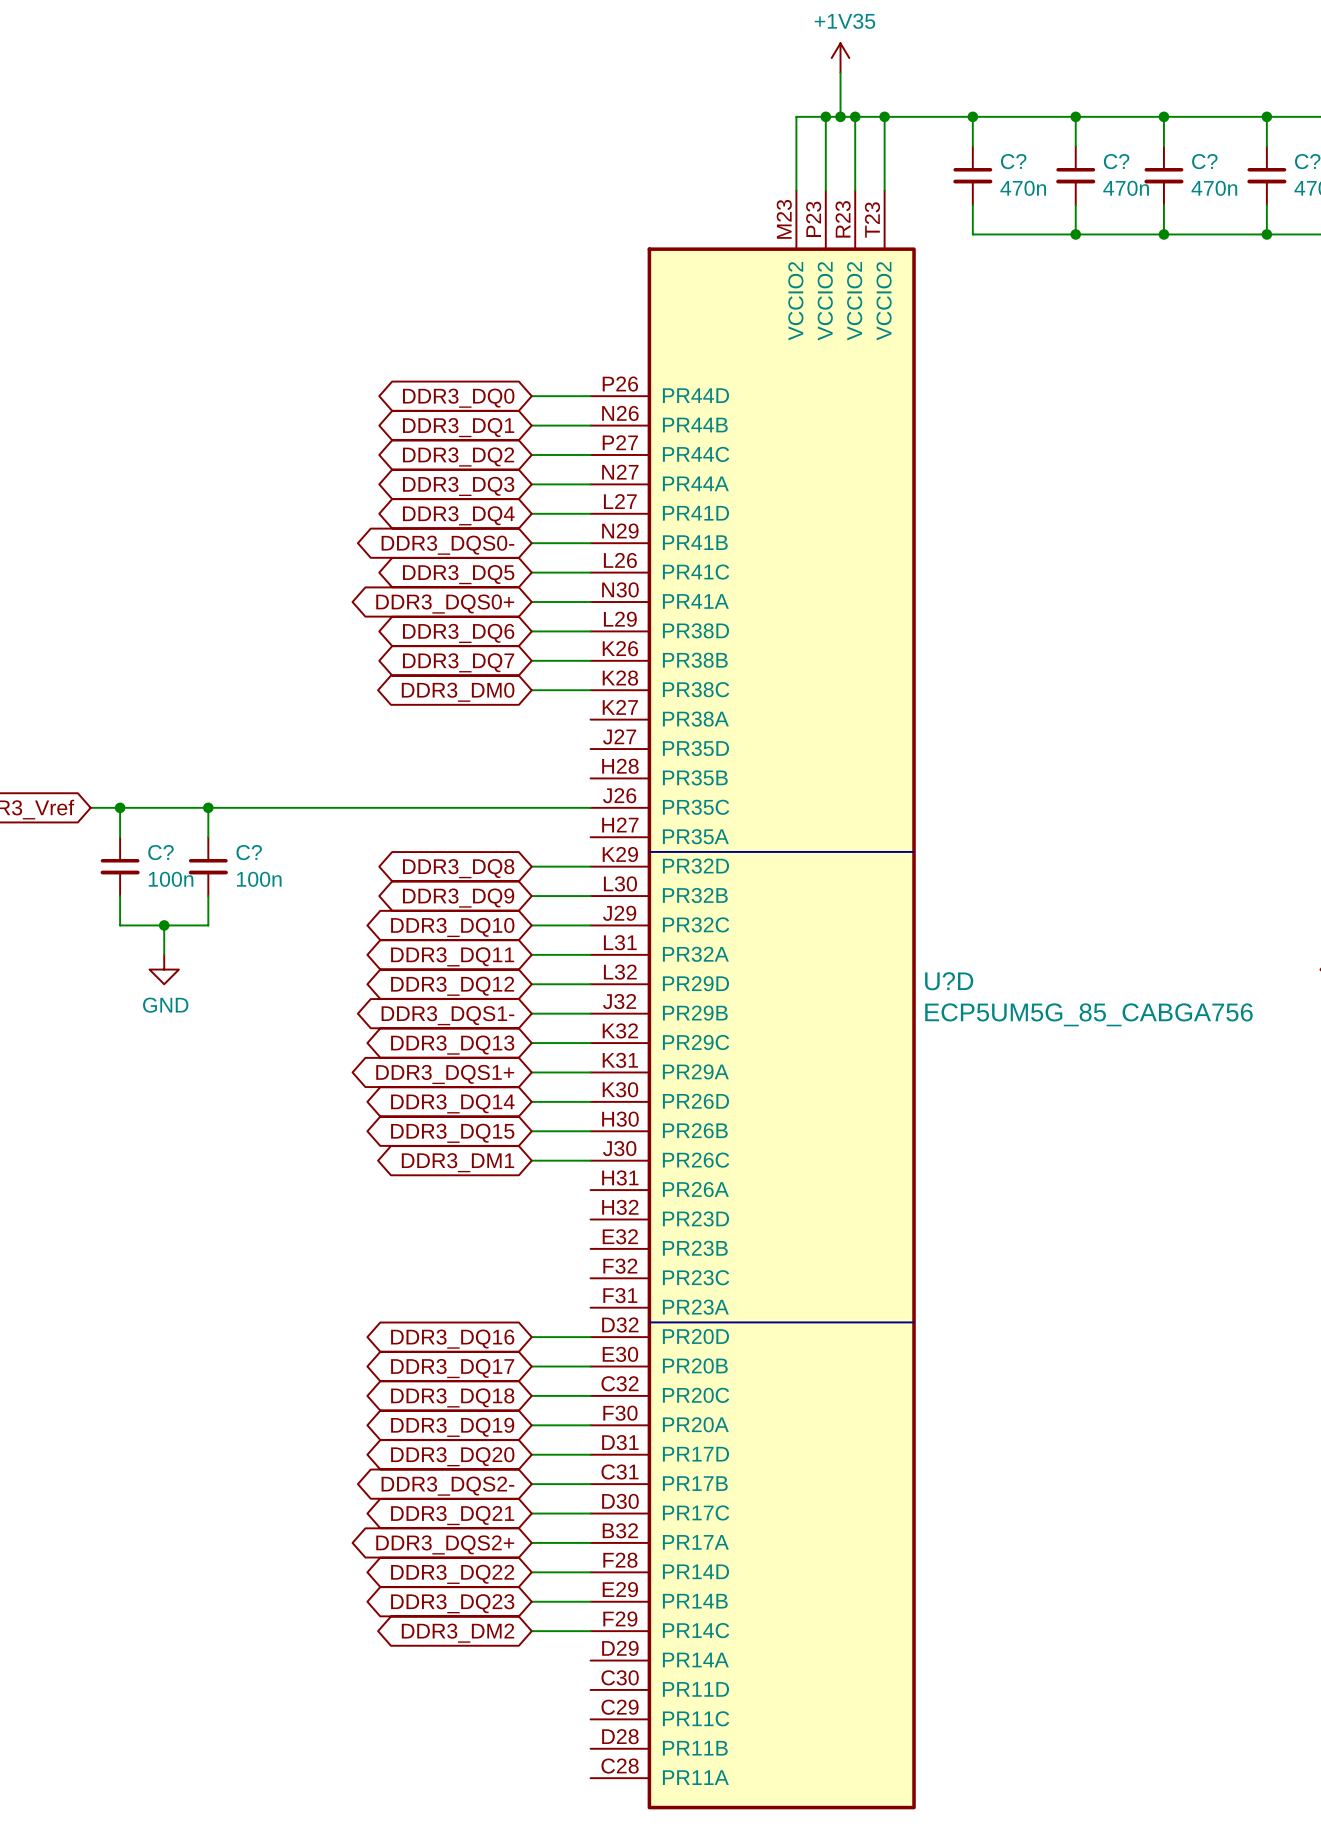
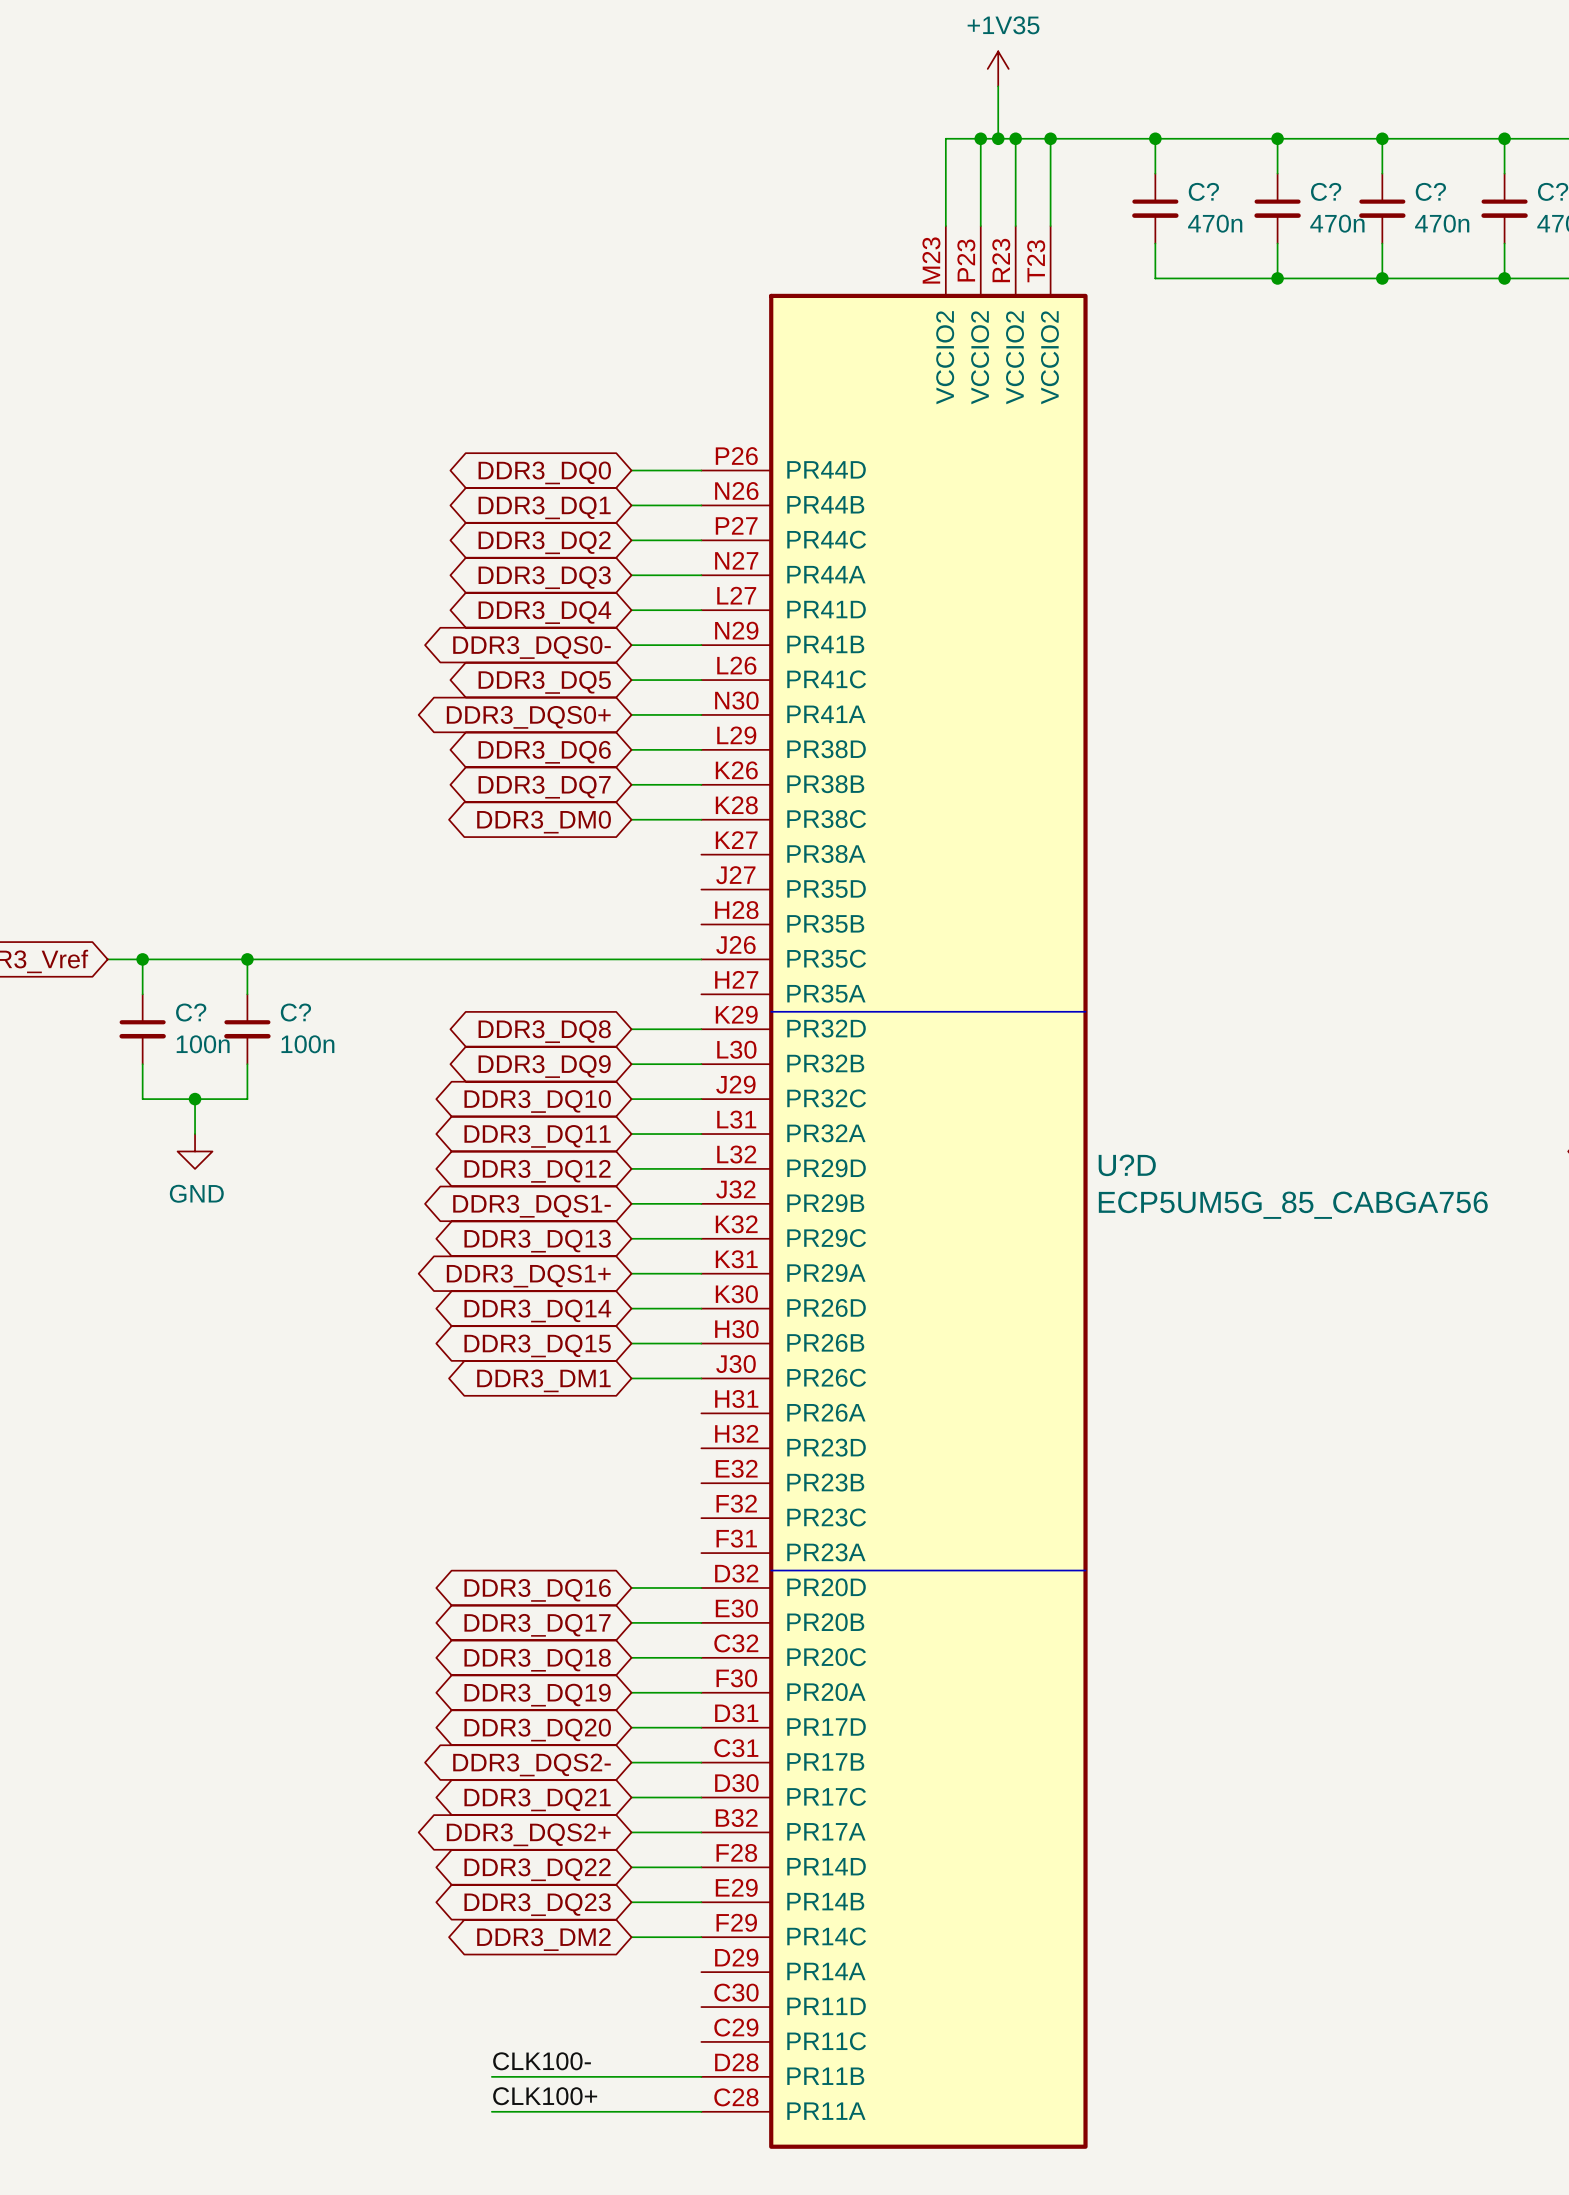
label: none -> CLK100- (542, 2061)
wire: none -> (491, 2076) (701, 2076)
label: none -> CLK100+ (545, 2096)
wire: none -> (491, 2111) (701, 2111)

